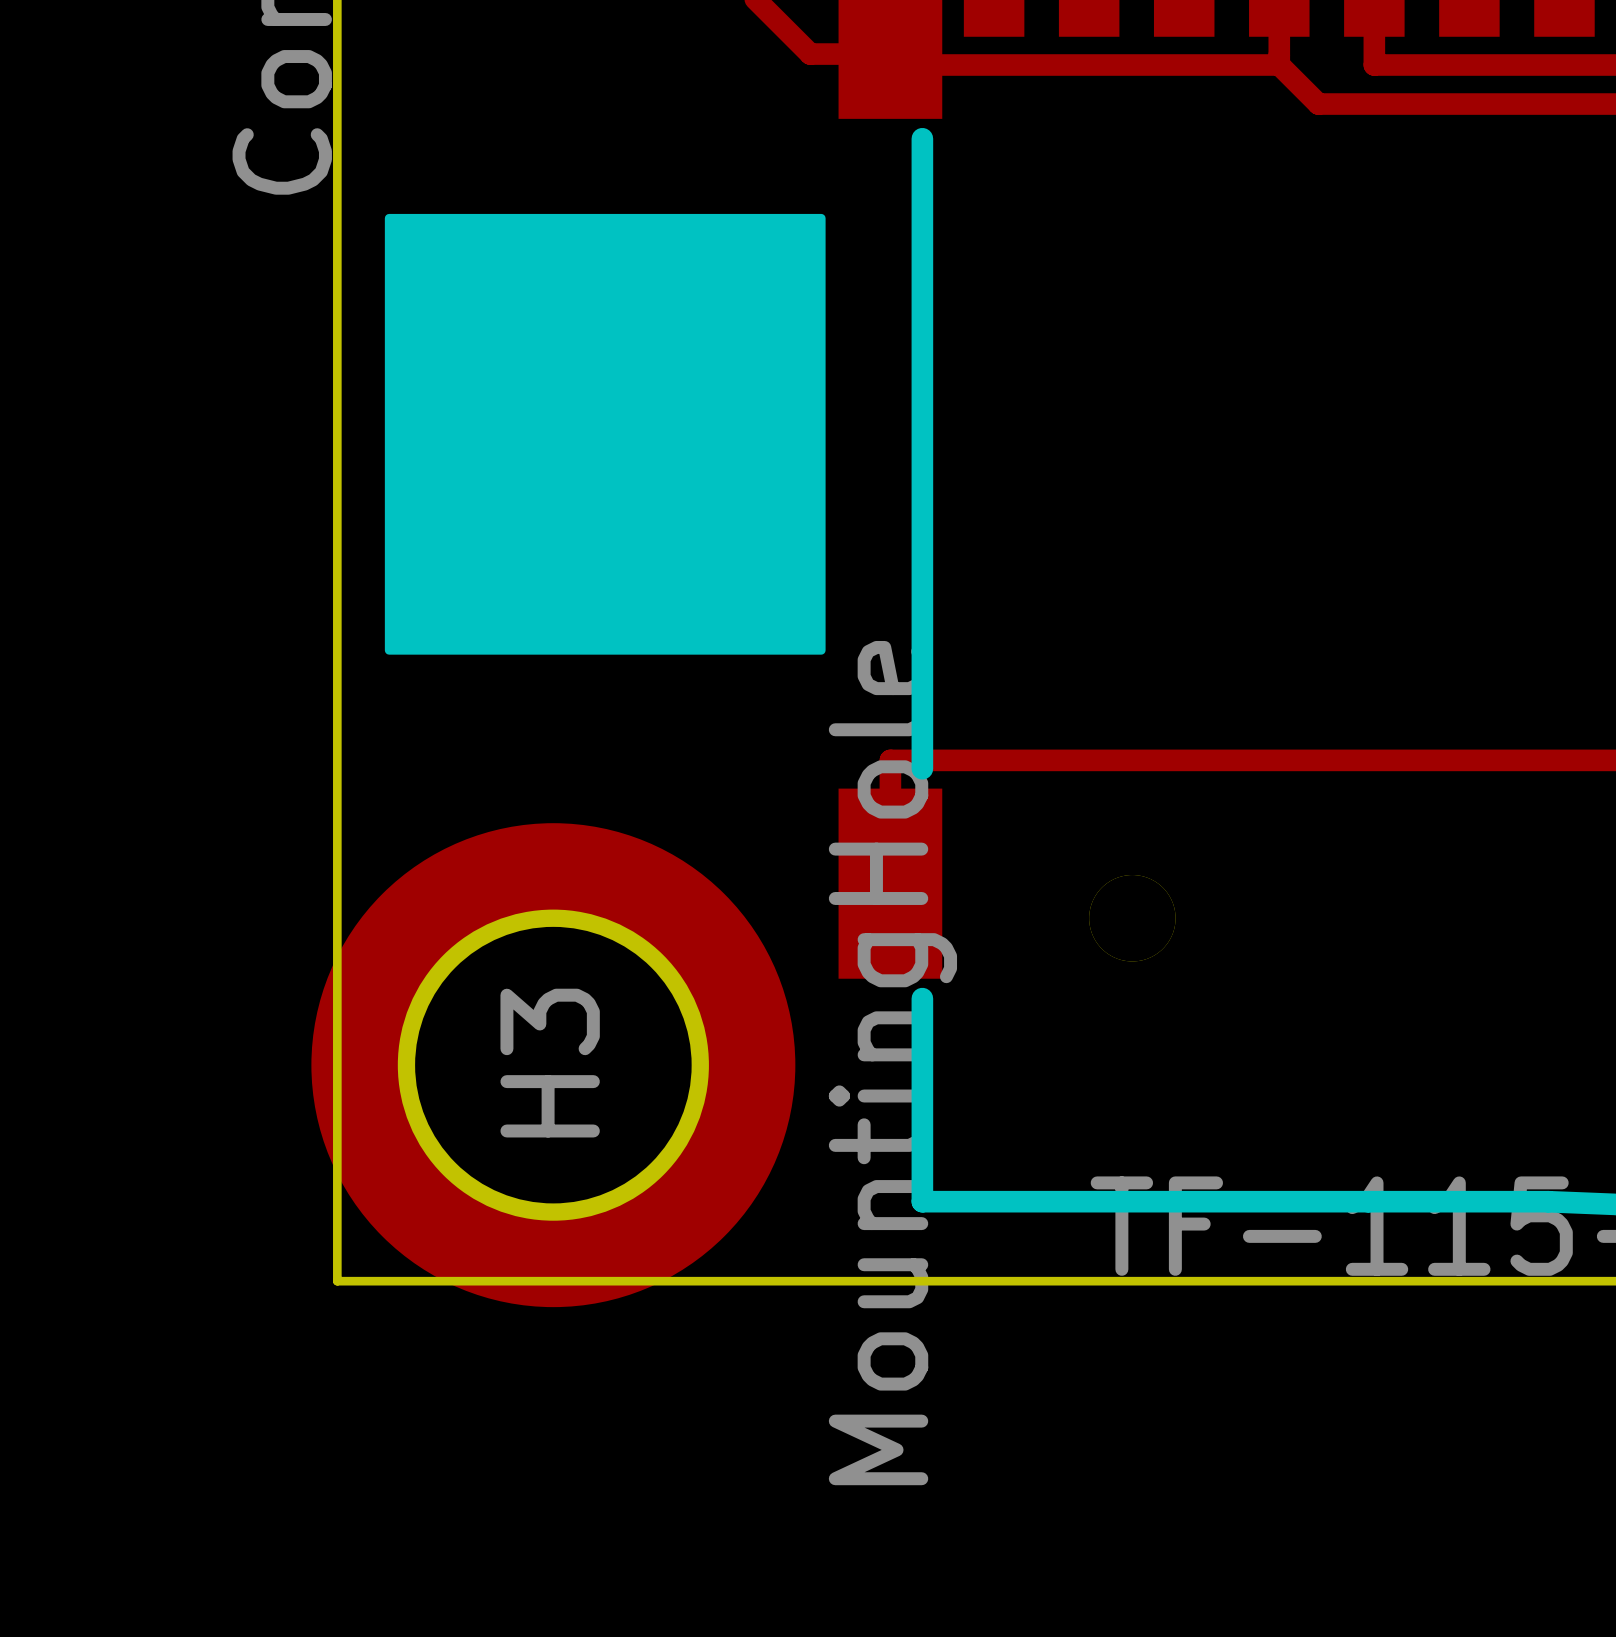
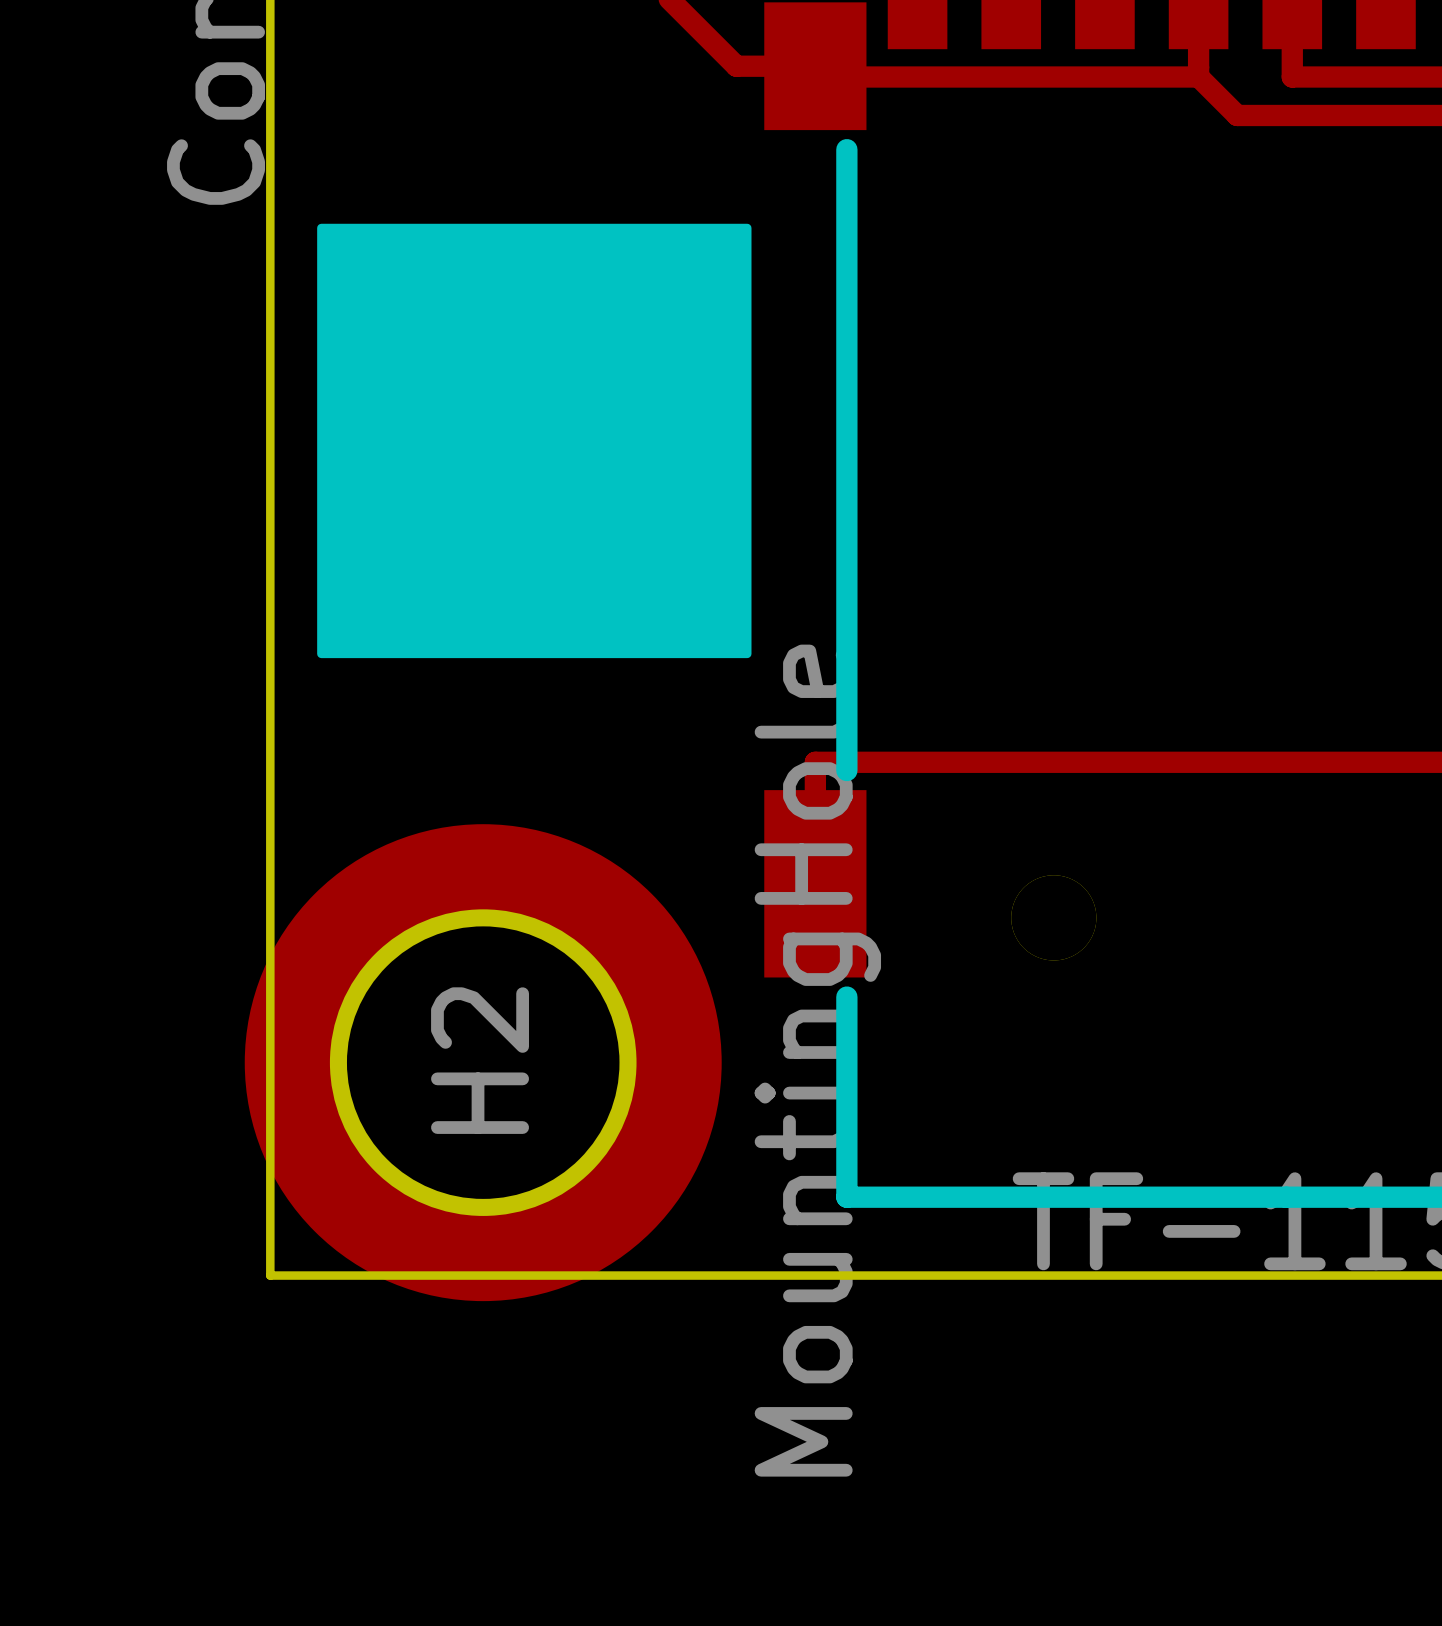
H3 name: H3 (550, 1063) -> H2 (480, 1060)

